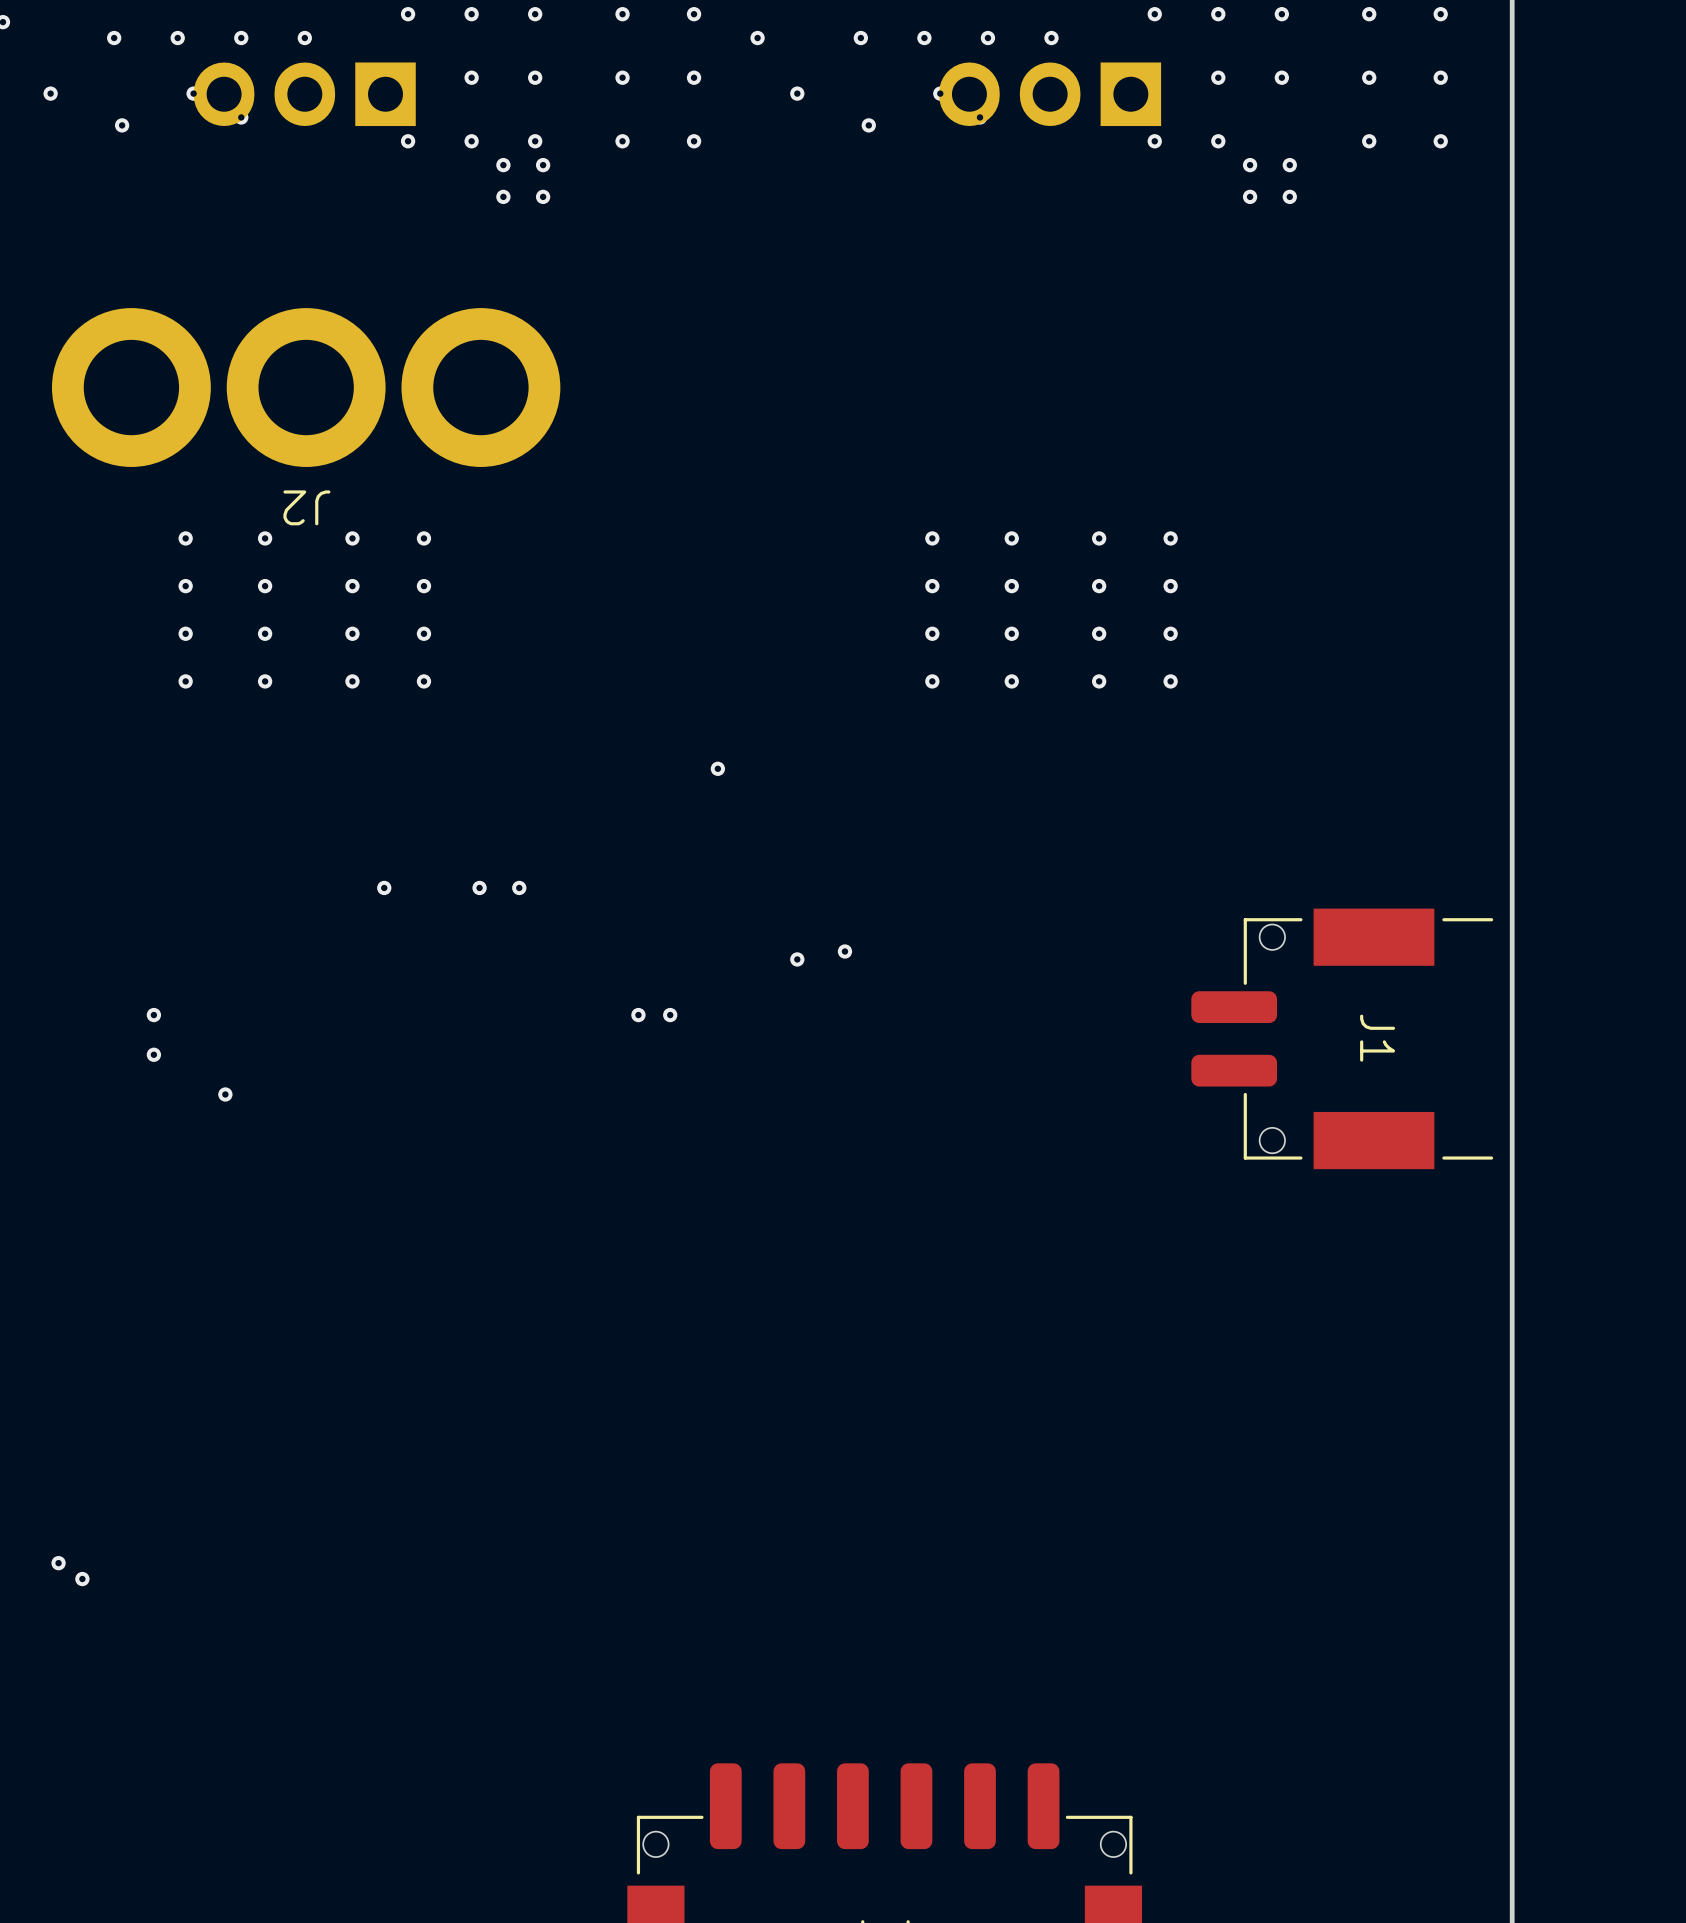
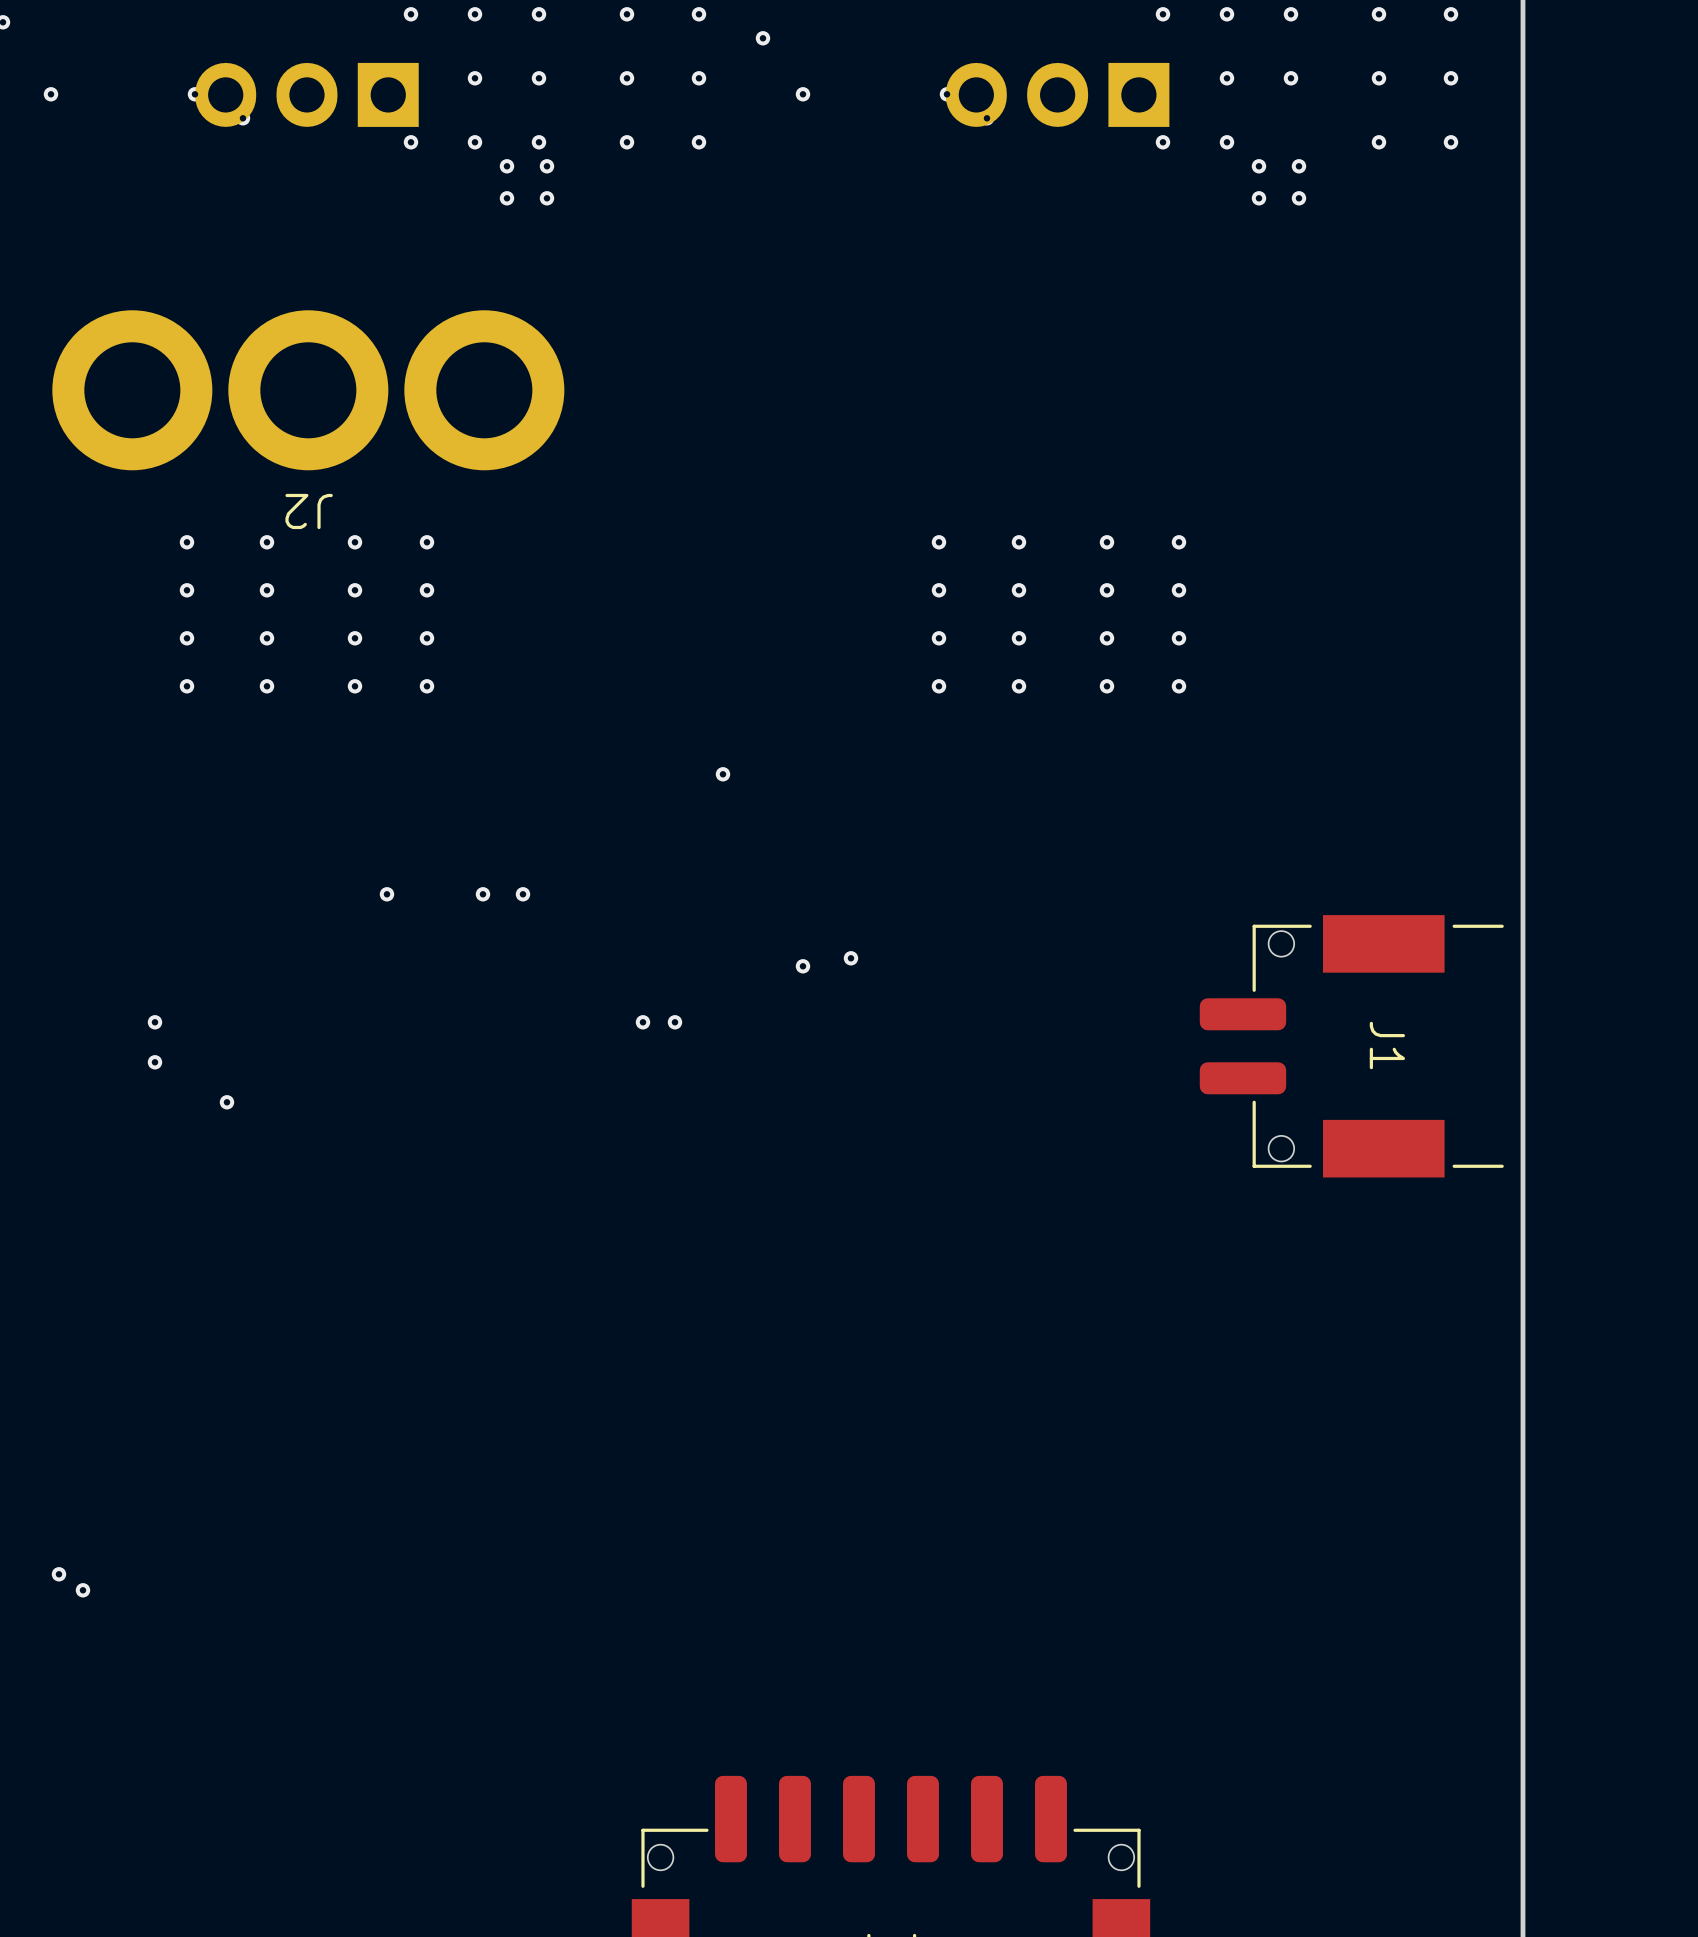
via: (114, 38) -> none
via: (177, 38) -> none
via: (241, 38) -> none
via: (304, 38) -> none
via: (860, 38) -> none
via: (924, 38) -> none
via: (987, 38) -> none
via: (1051, 38) -> none
via: (122, 125) -> none
via: (868, 125) -> none

